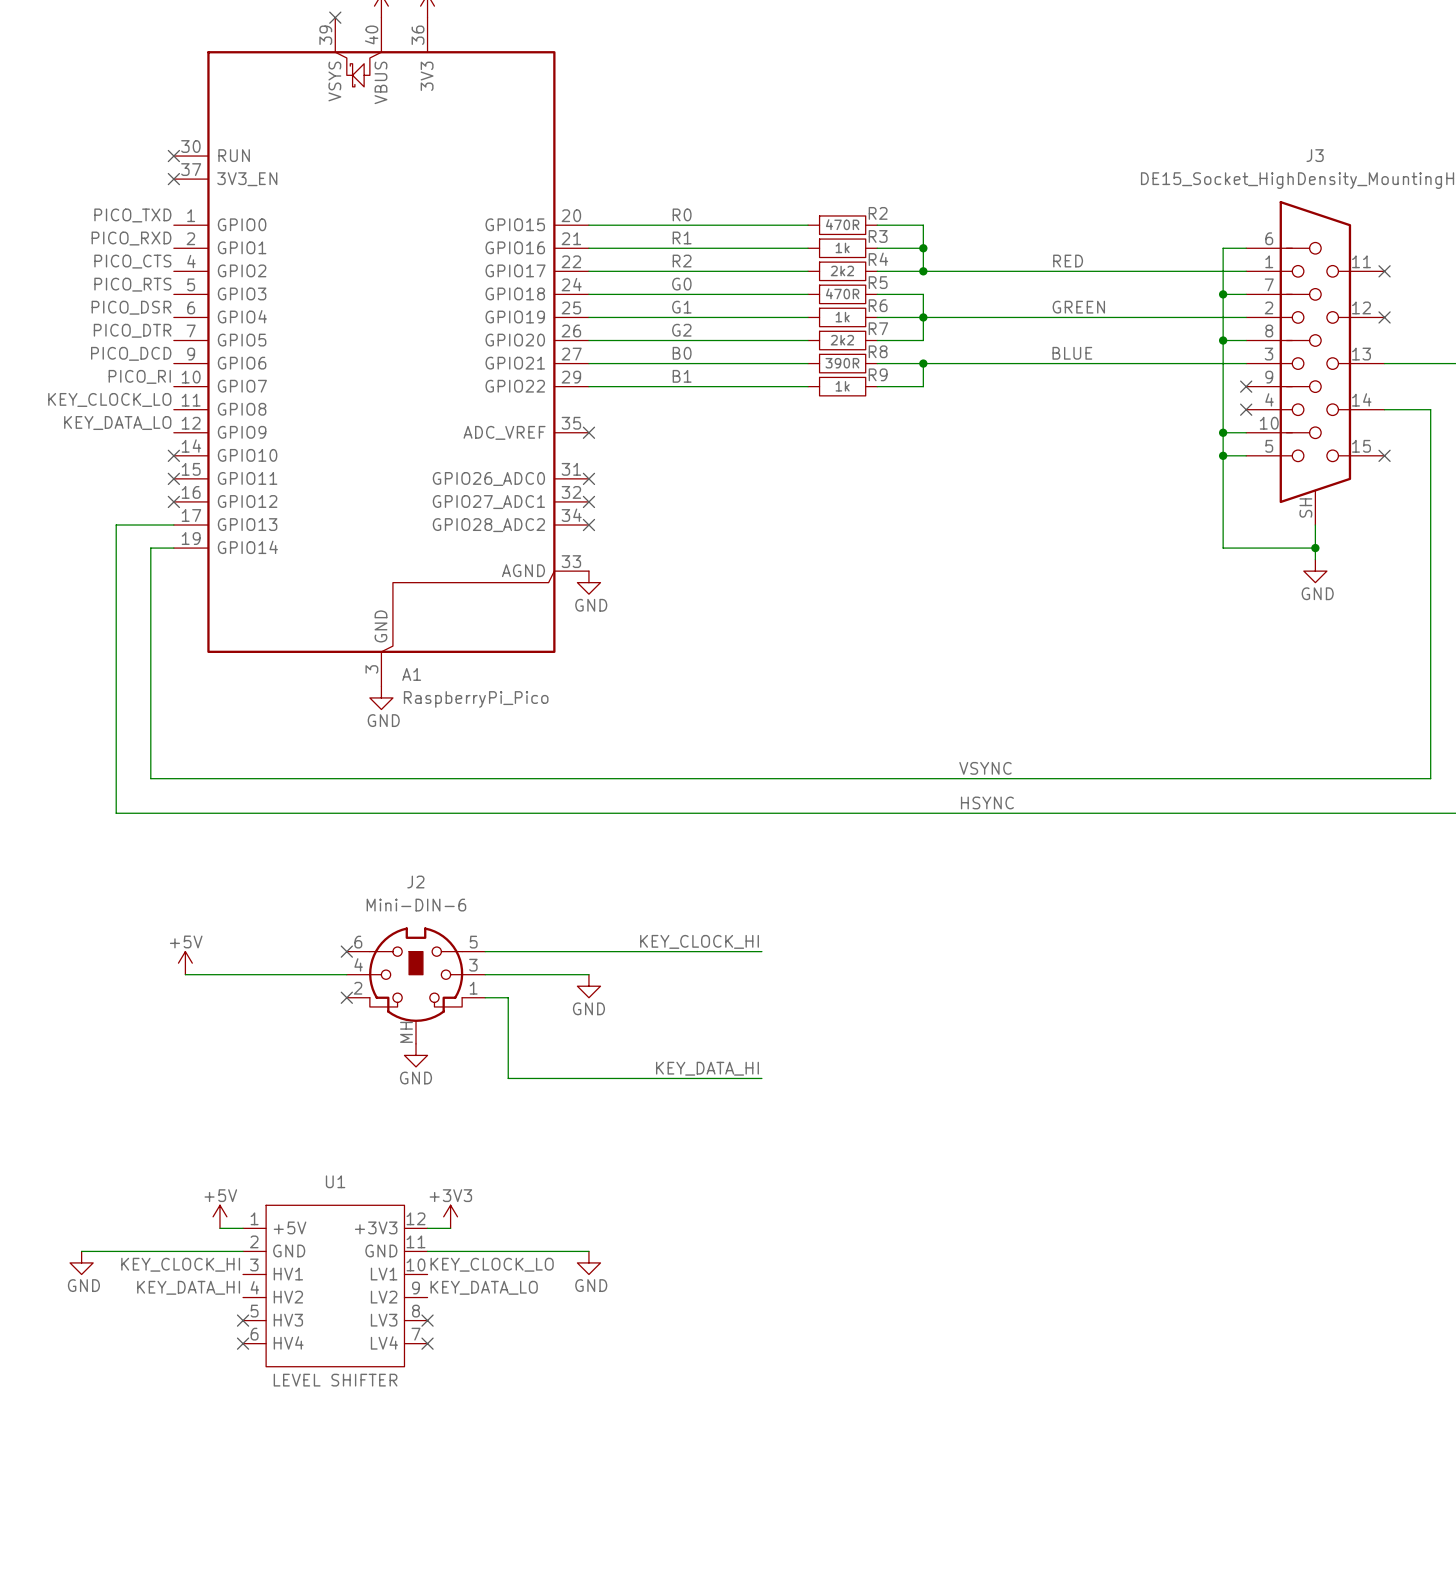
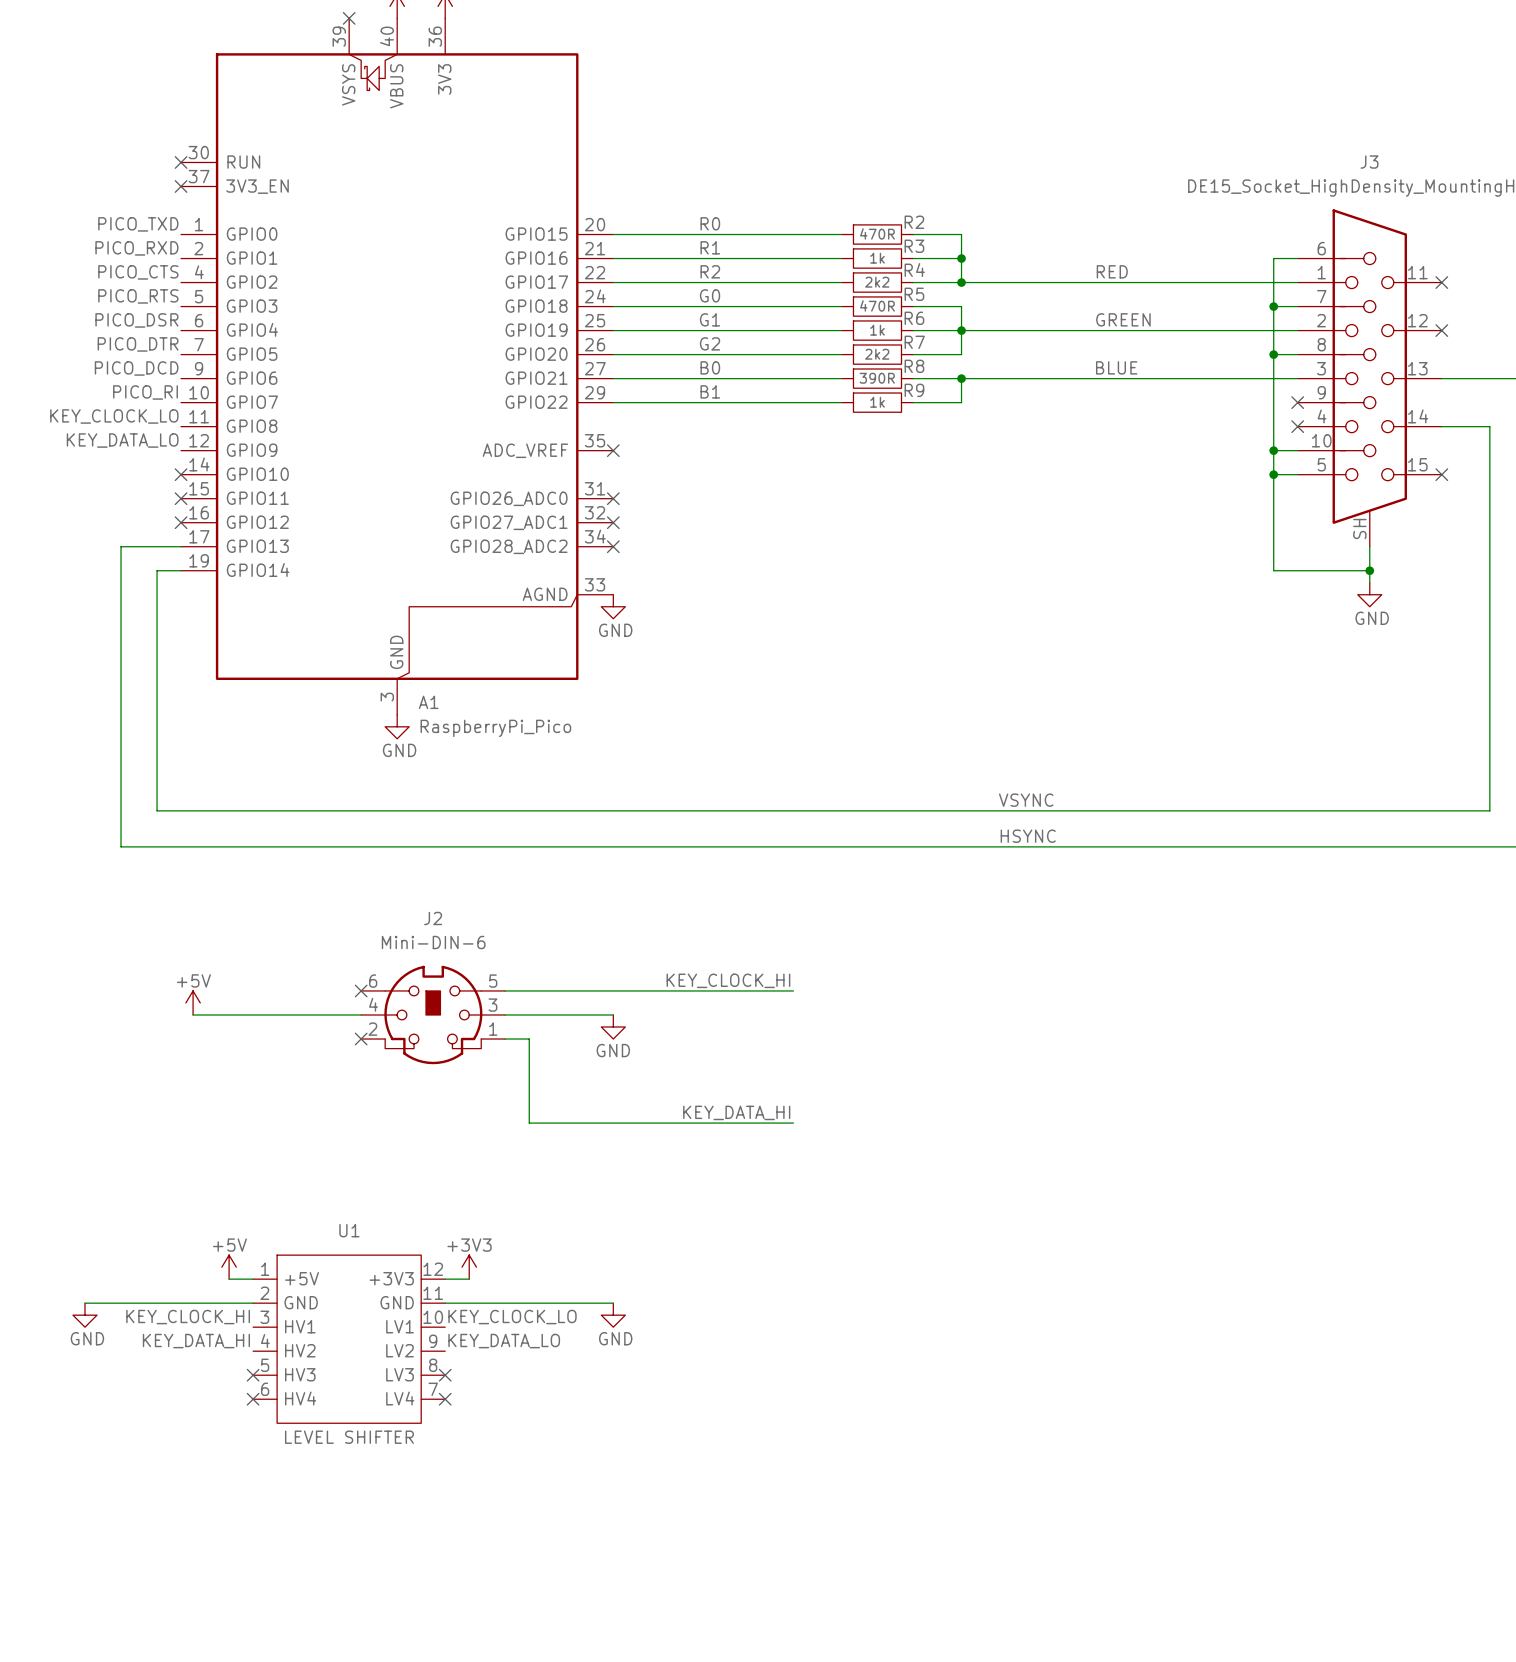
J2 symbol: [346, 927, 486, 1044] -> [361, 965, 506, 1065]
power symbol: GND (416, 1055) -> none

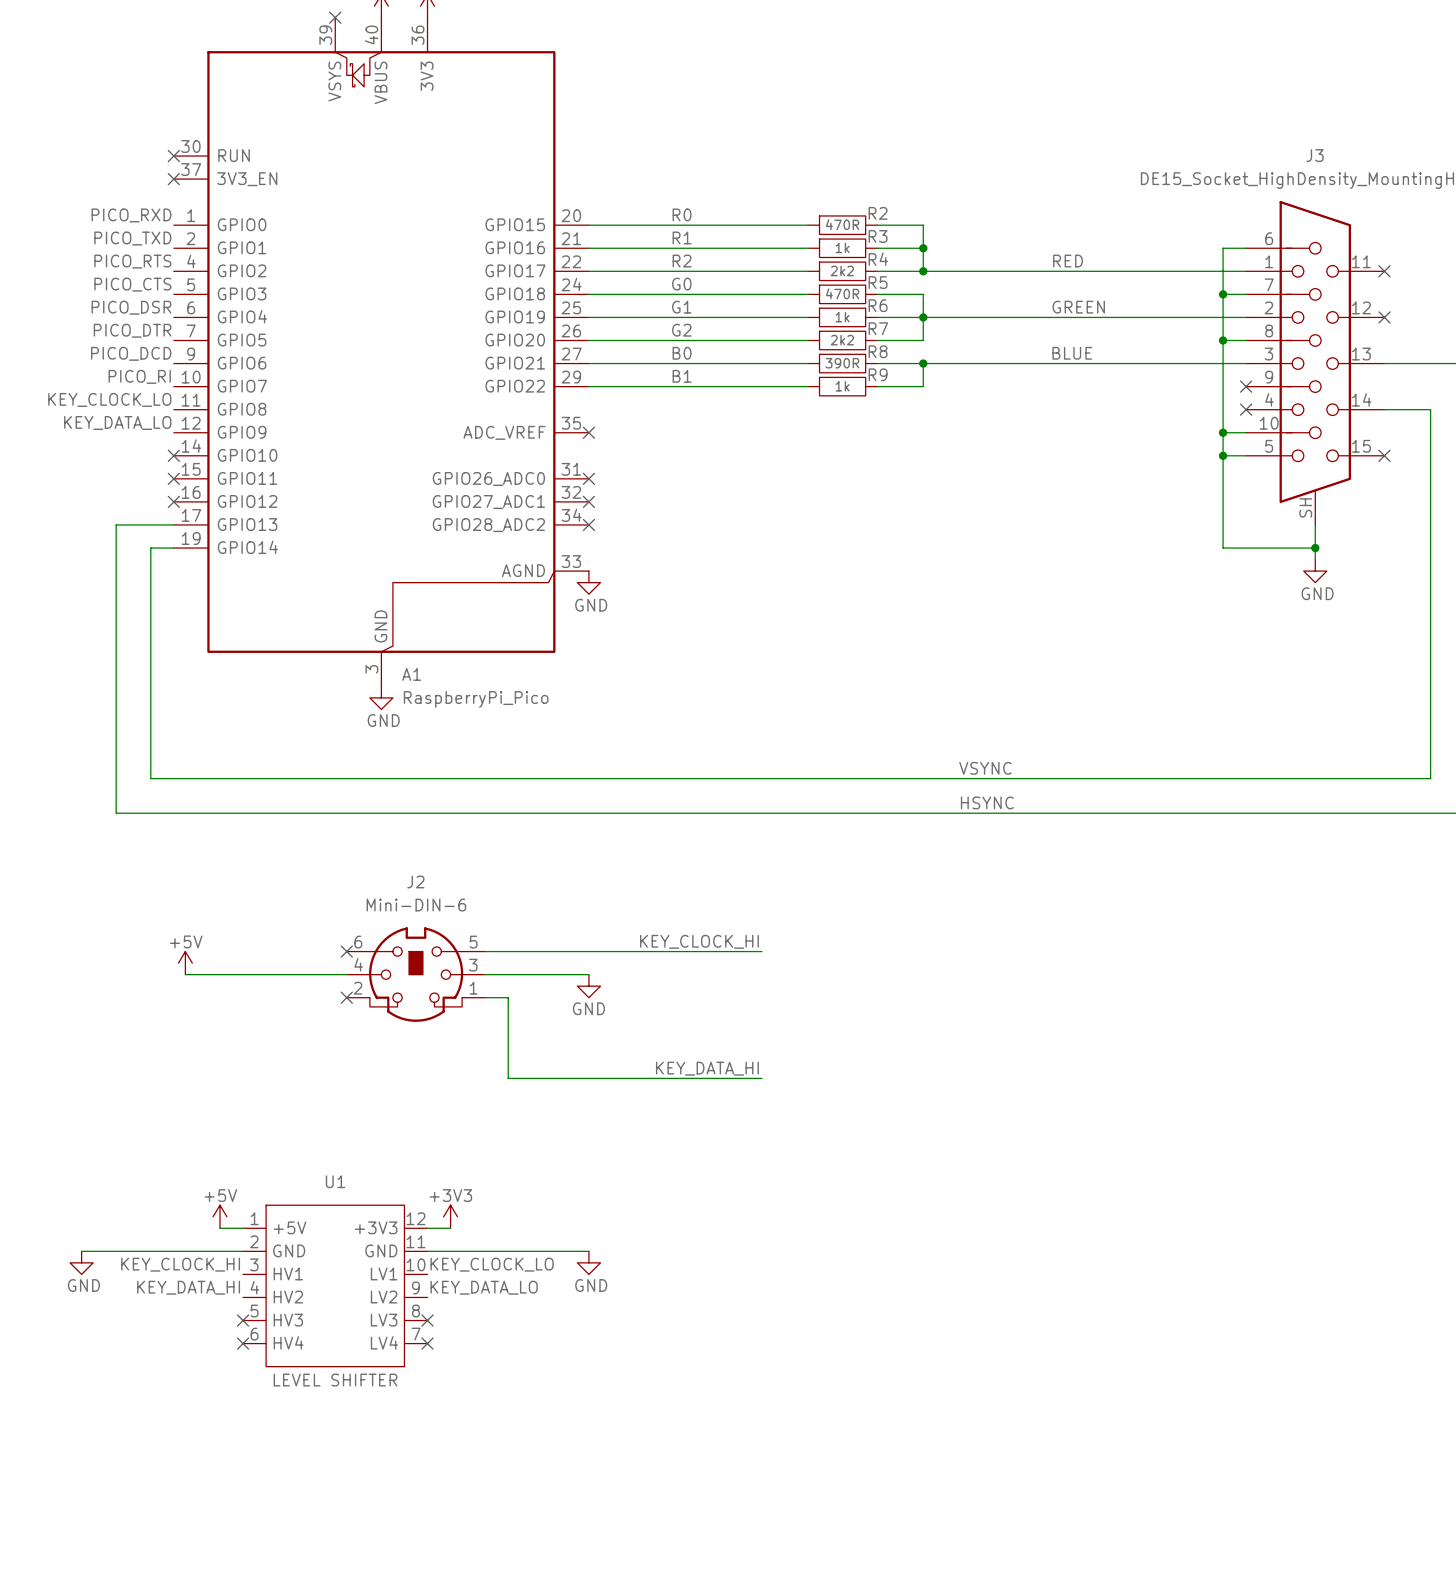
label: PICO_TXD (138, 224) -> PICO_RXD (131, 215)
label: PICO_RXD (136, 248) -> PICO_TXD (132, 238)
label: PICO_CTS (138, 272) -> PICO_RTS (132, 261)
label: PICO_RTS (138, 296) -> PICO_CTS (132, 284)

